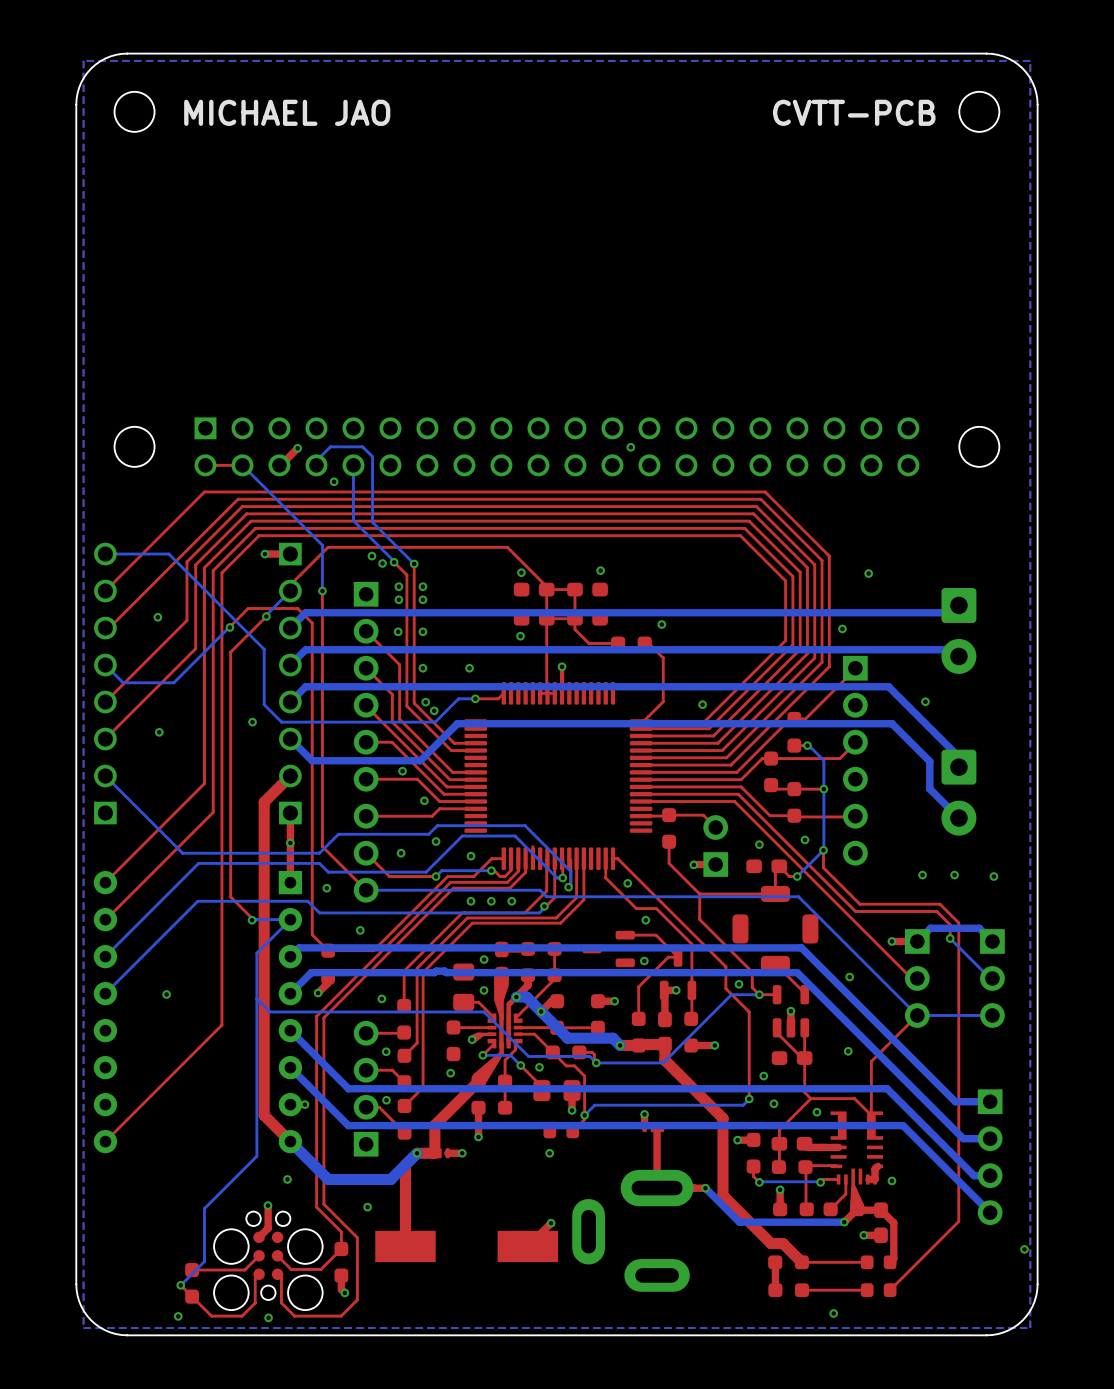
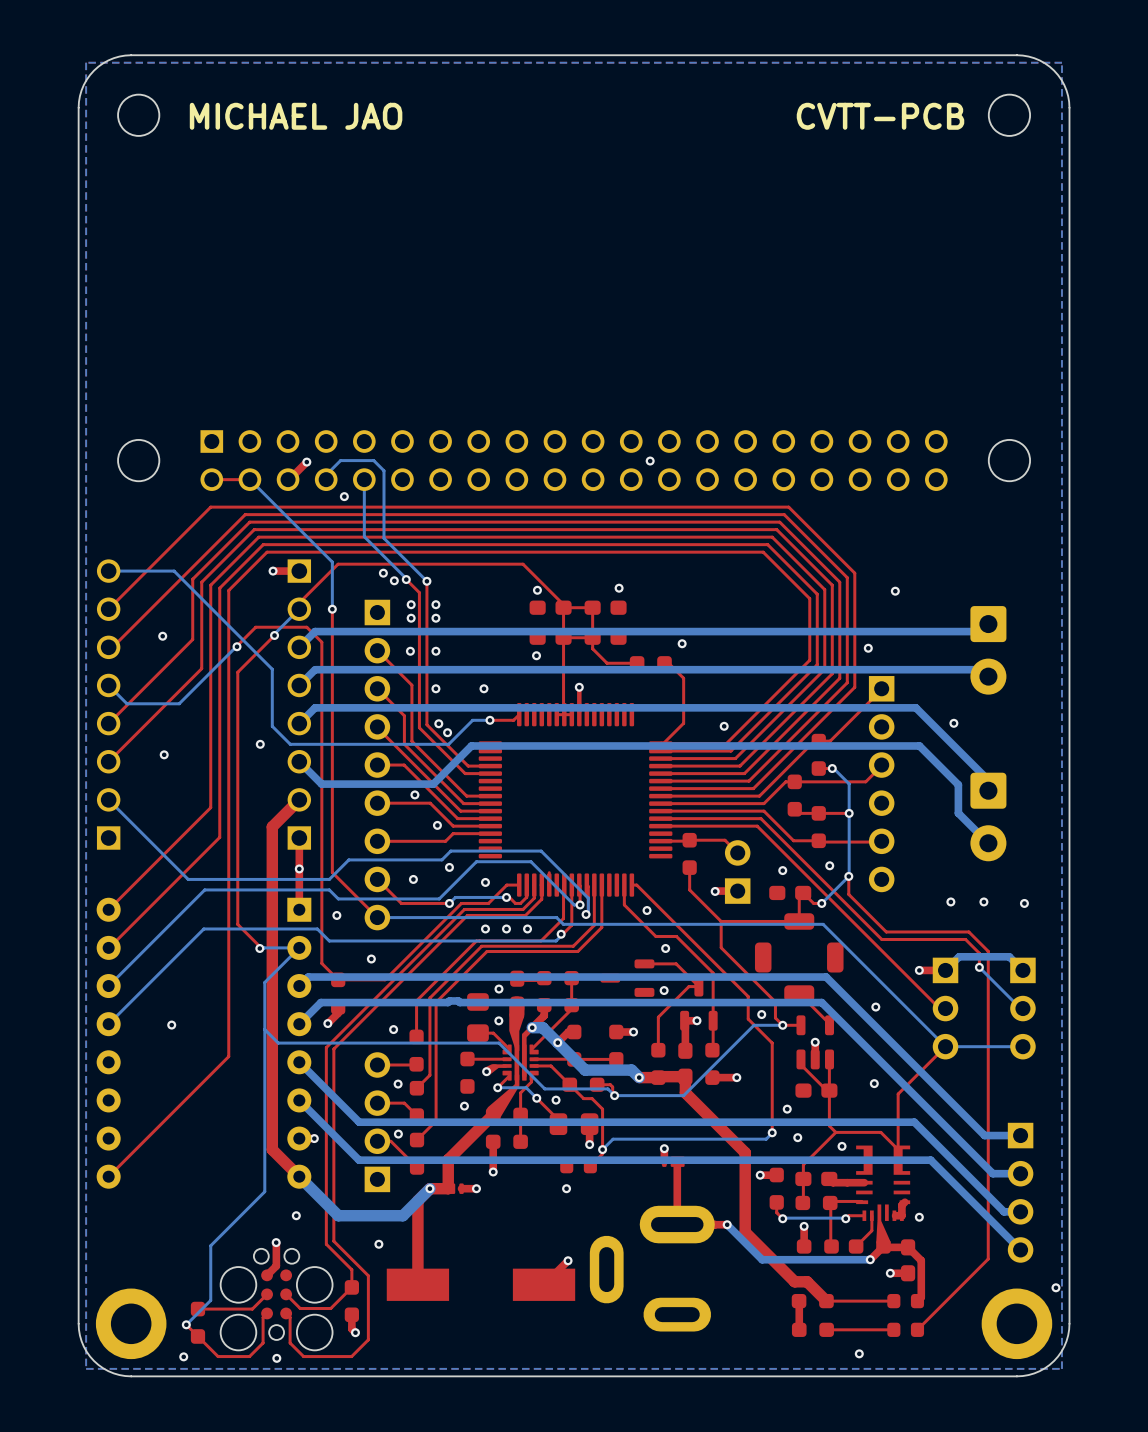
part: none -> (131, 1323)
part: none -> (1016, 1323)

